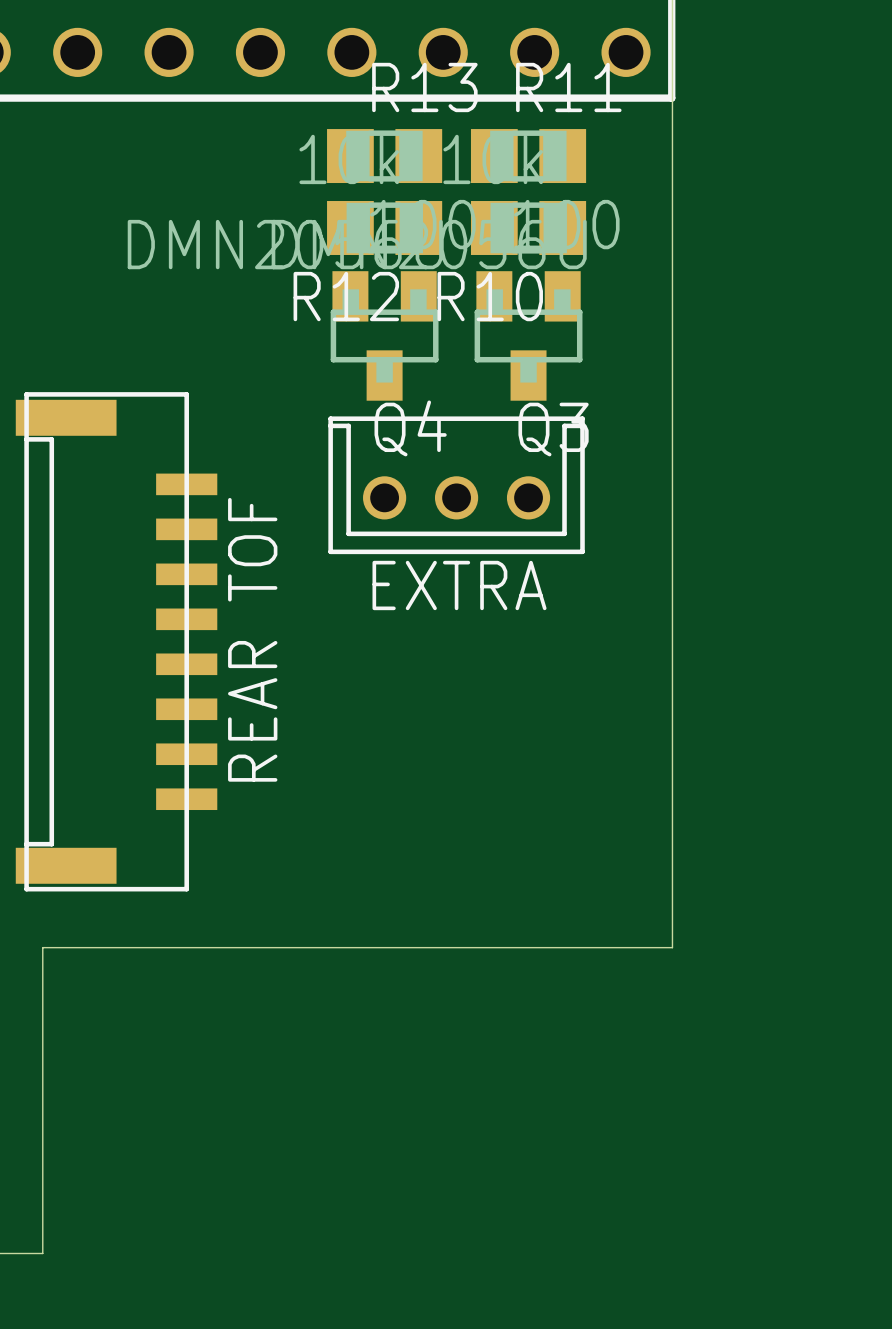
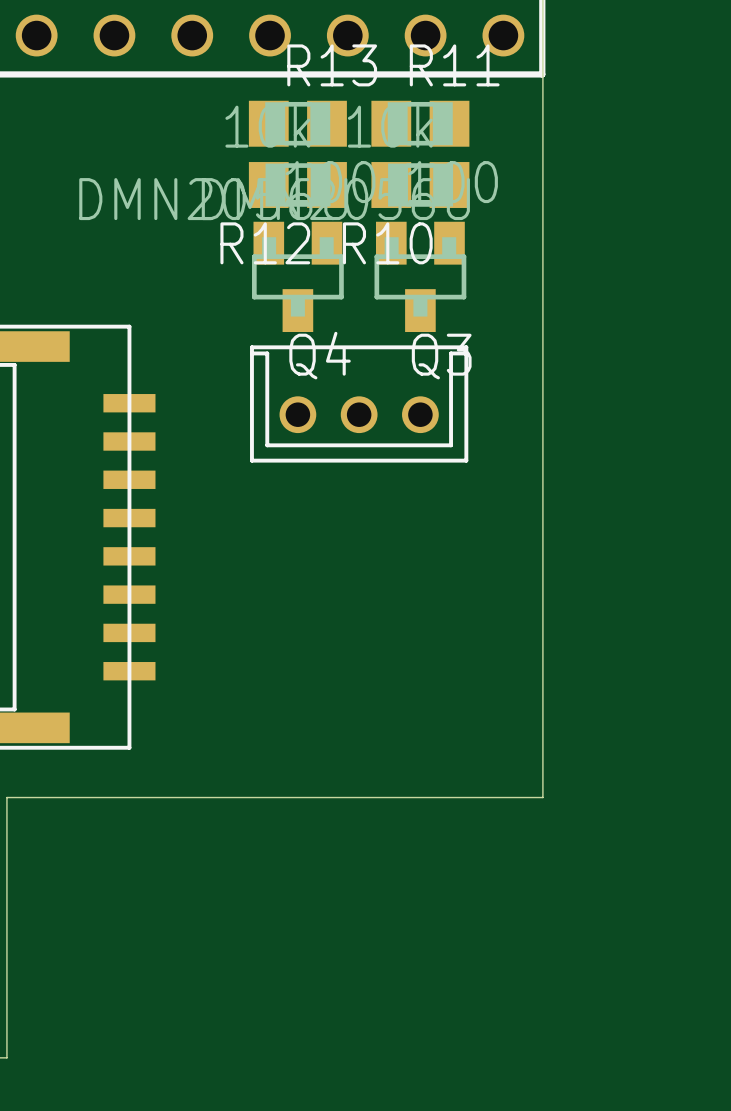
text: EXTRA (459, 585) -> none
text: REAR TOF (252, 639) -> none

